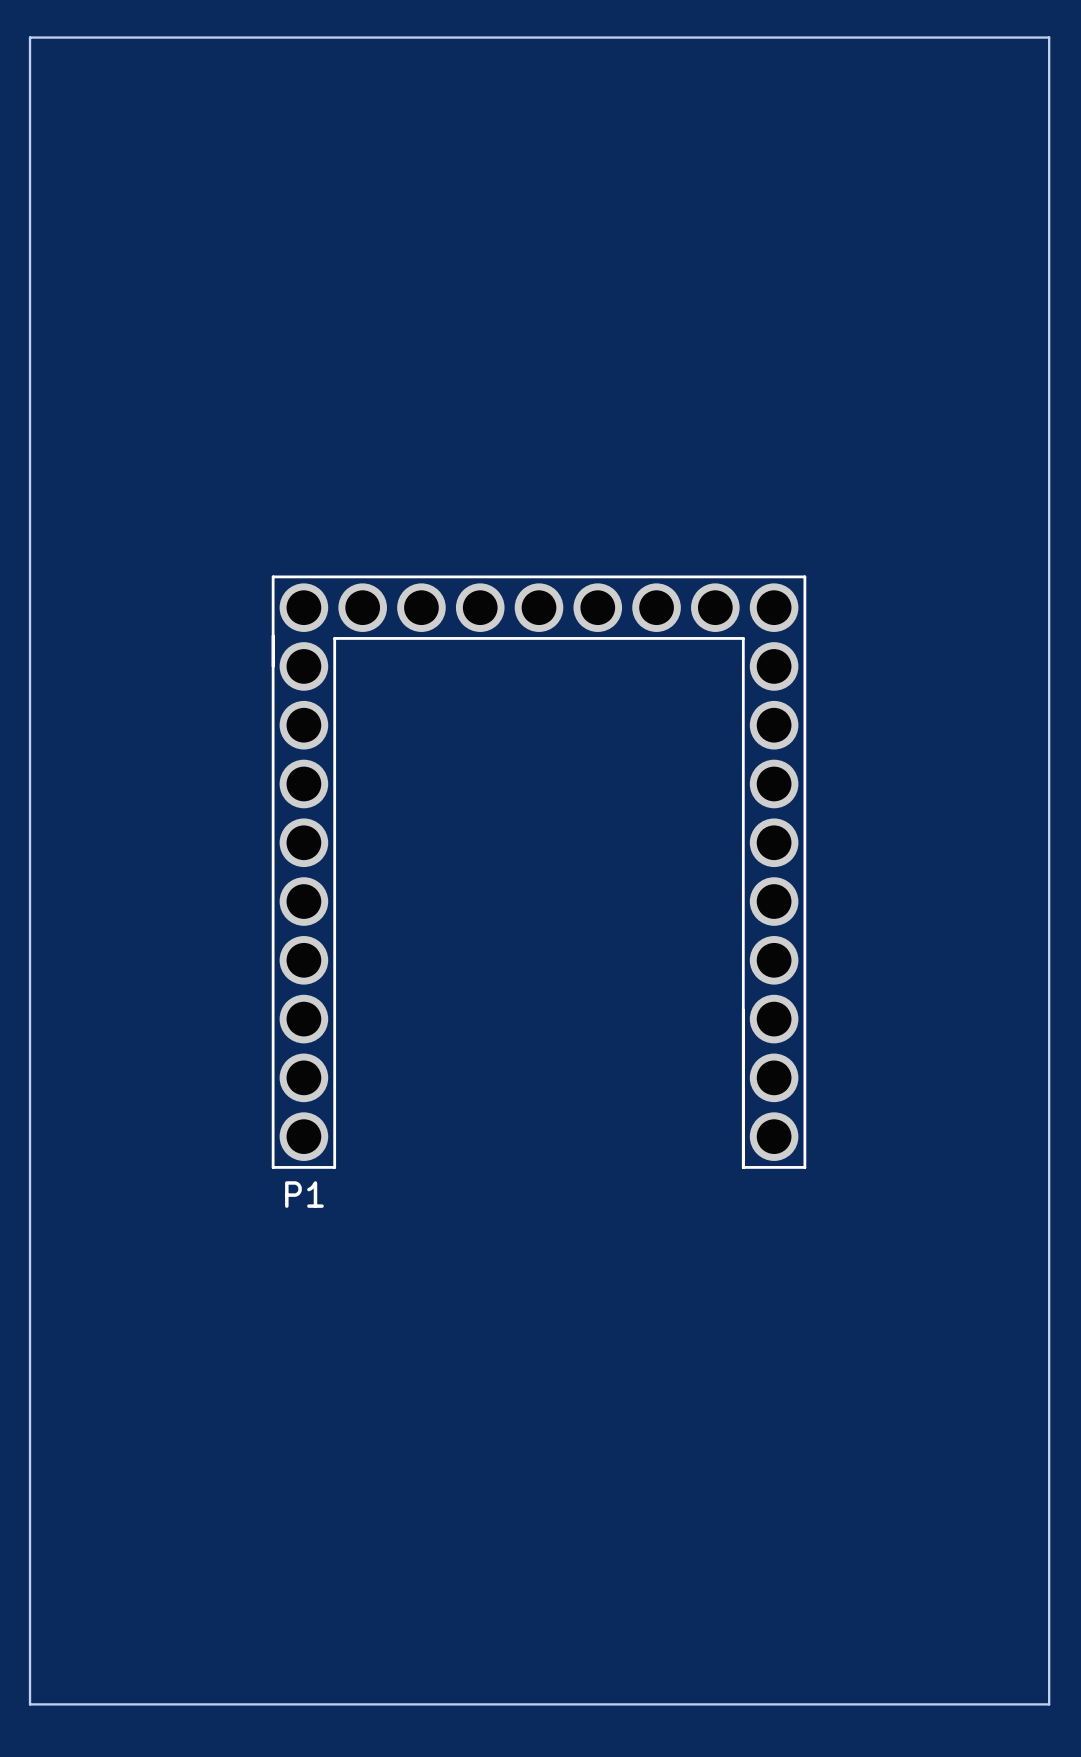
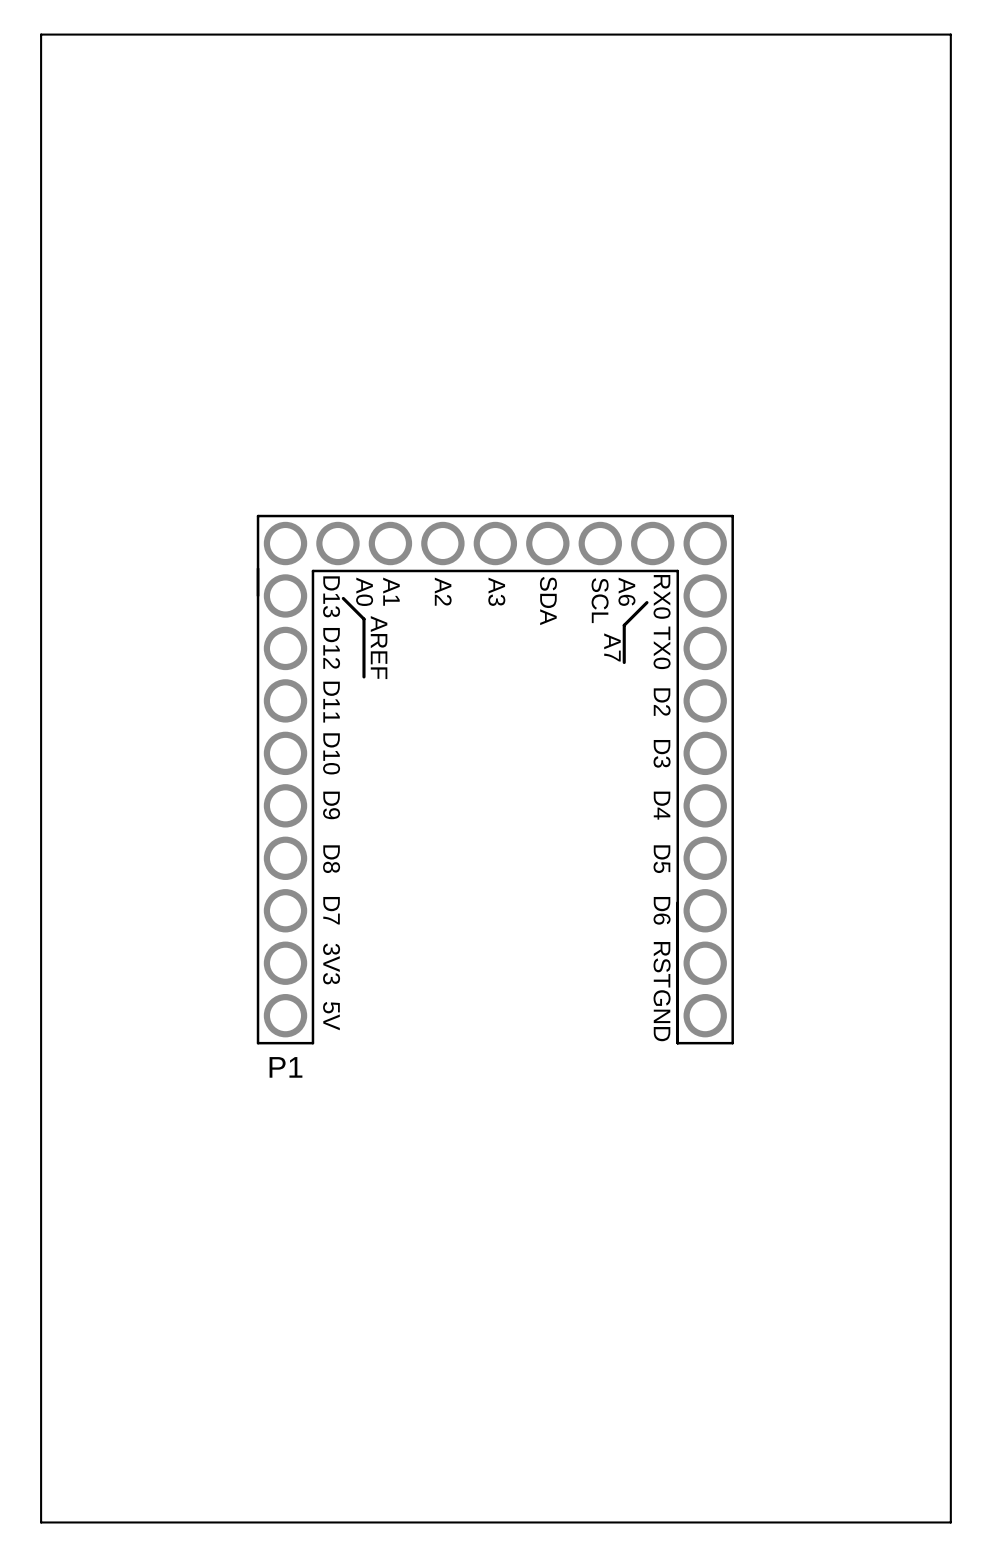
P1 footprint: [271, 575, 807, 1169] -> [256, 514, 734, 1045]

